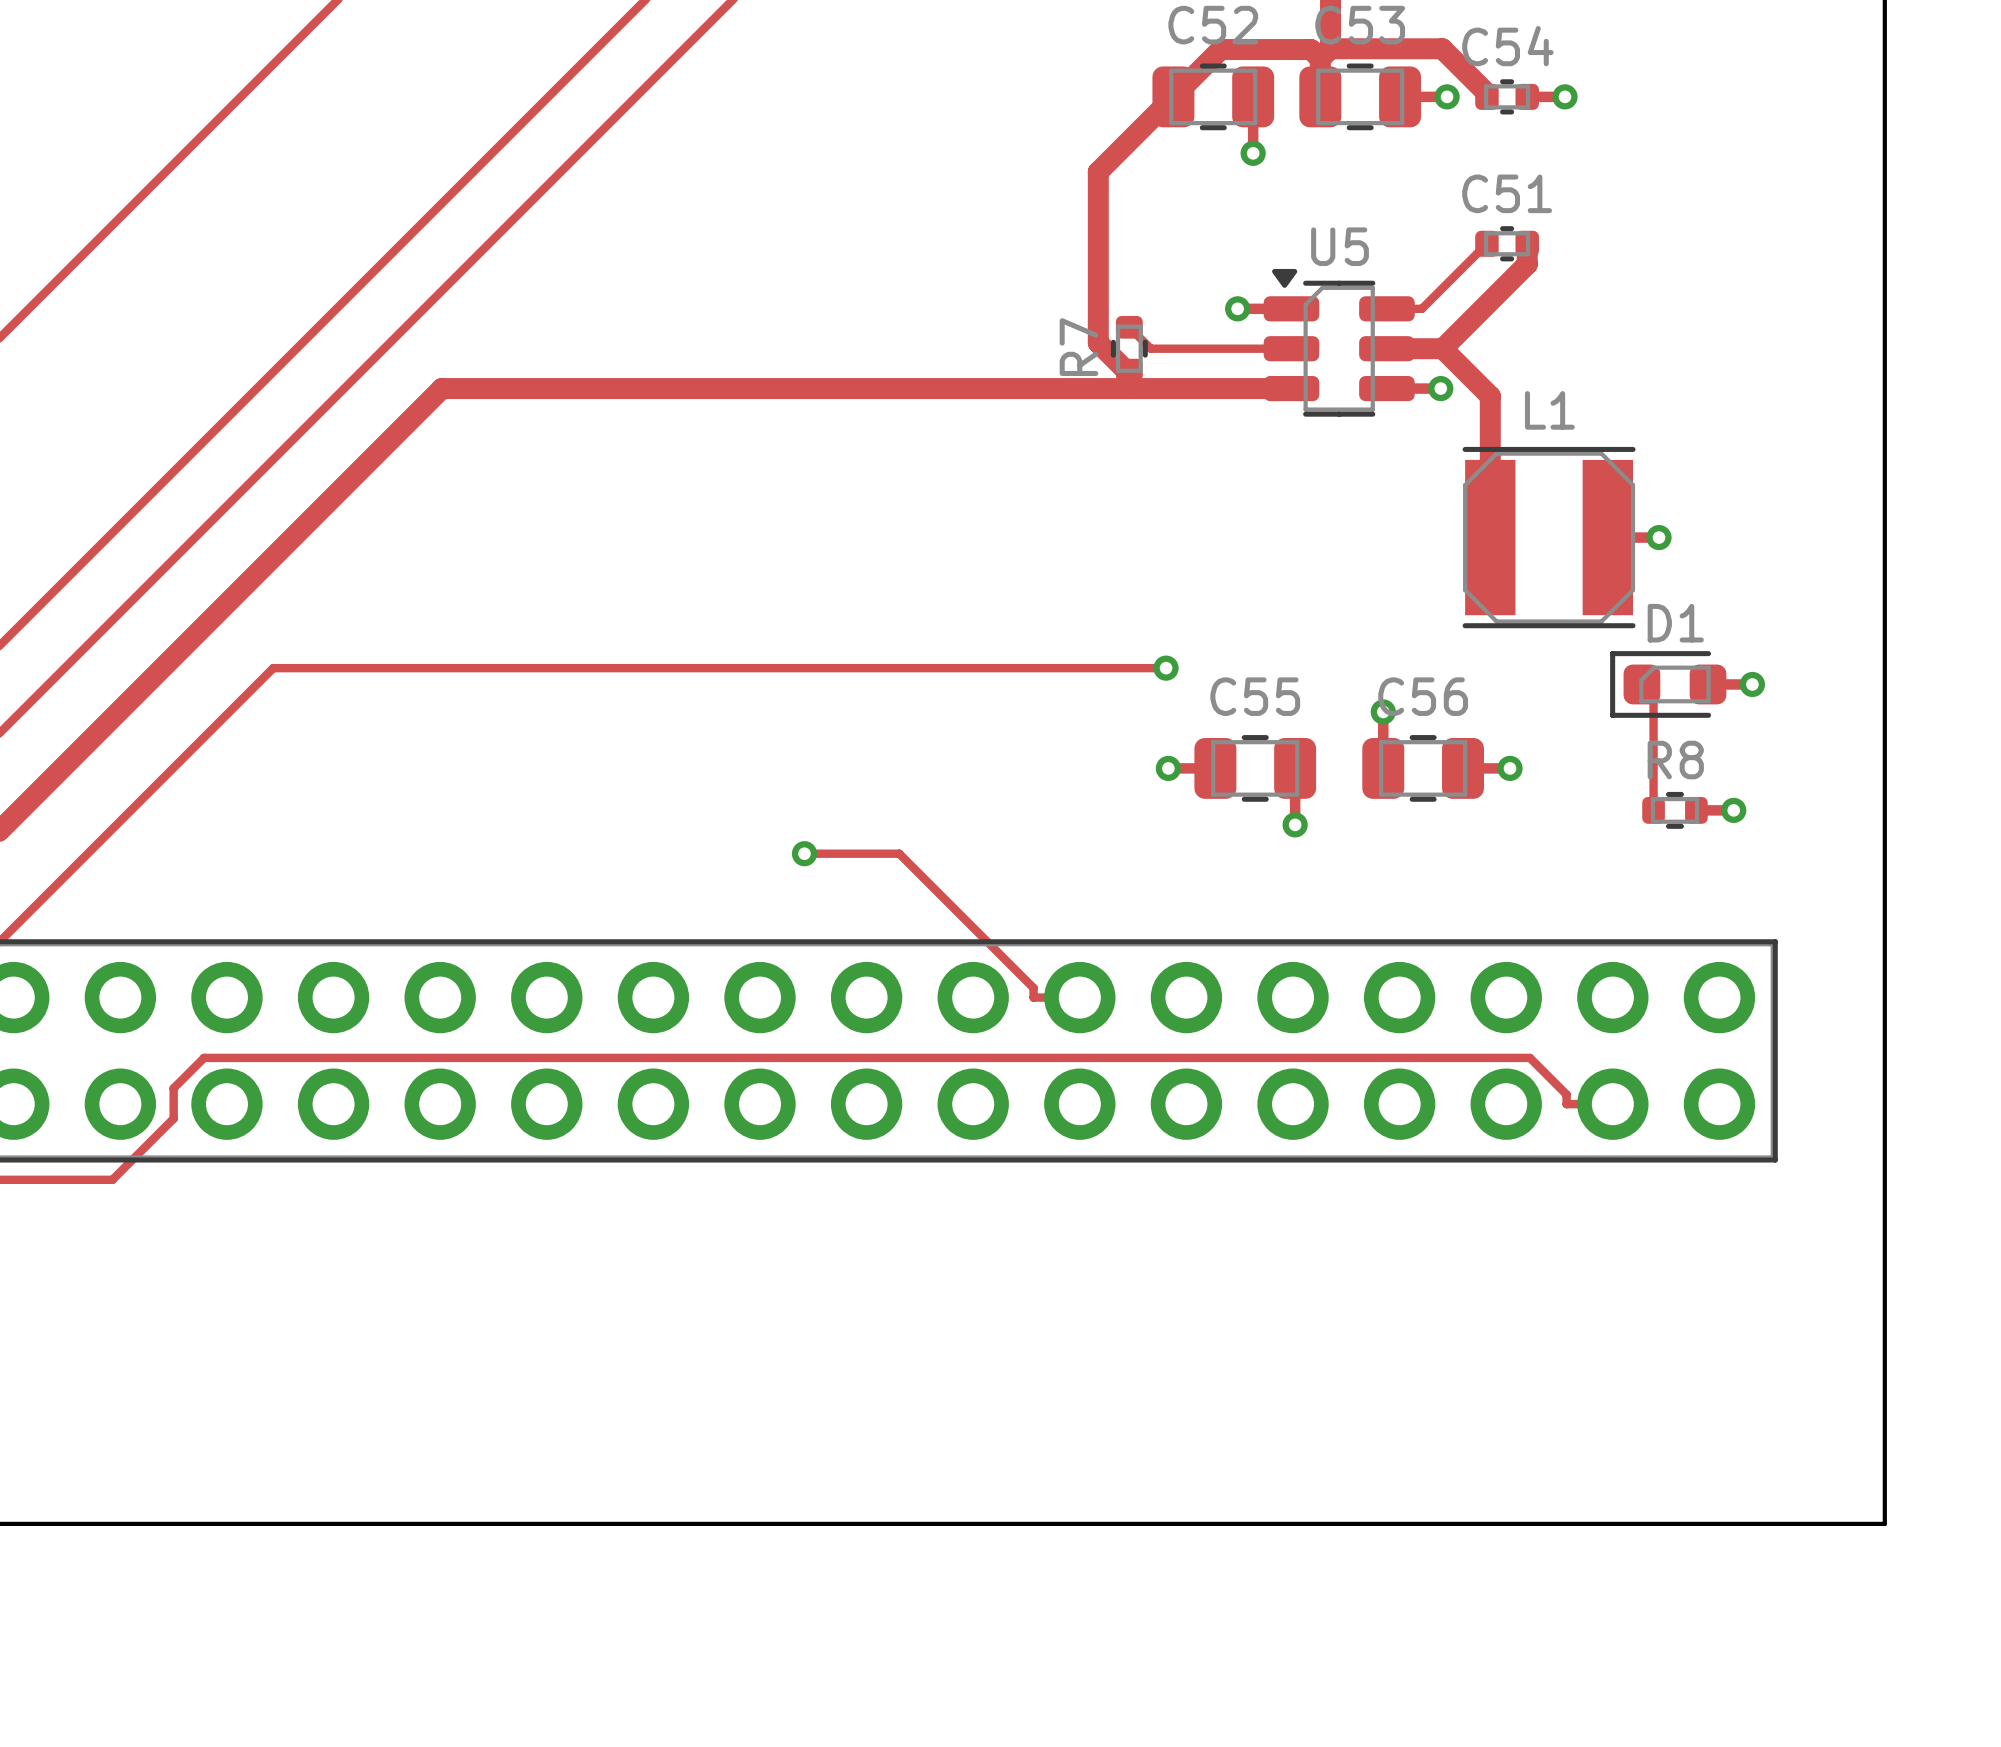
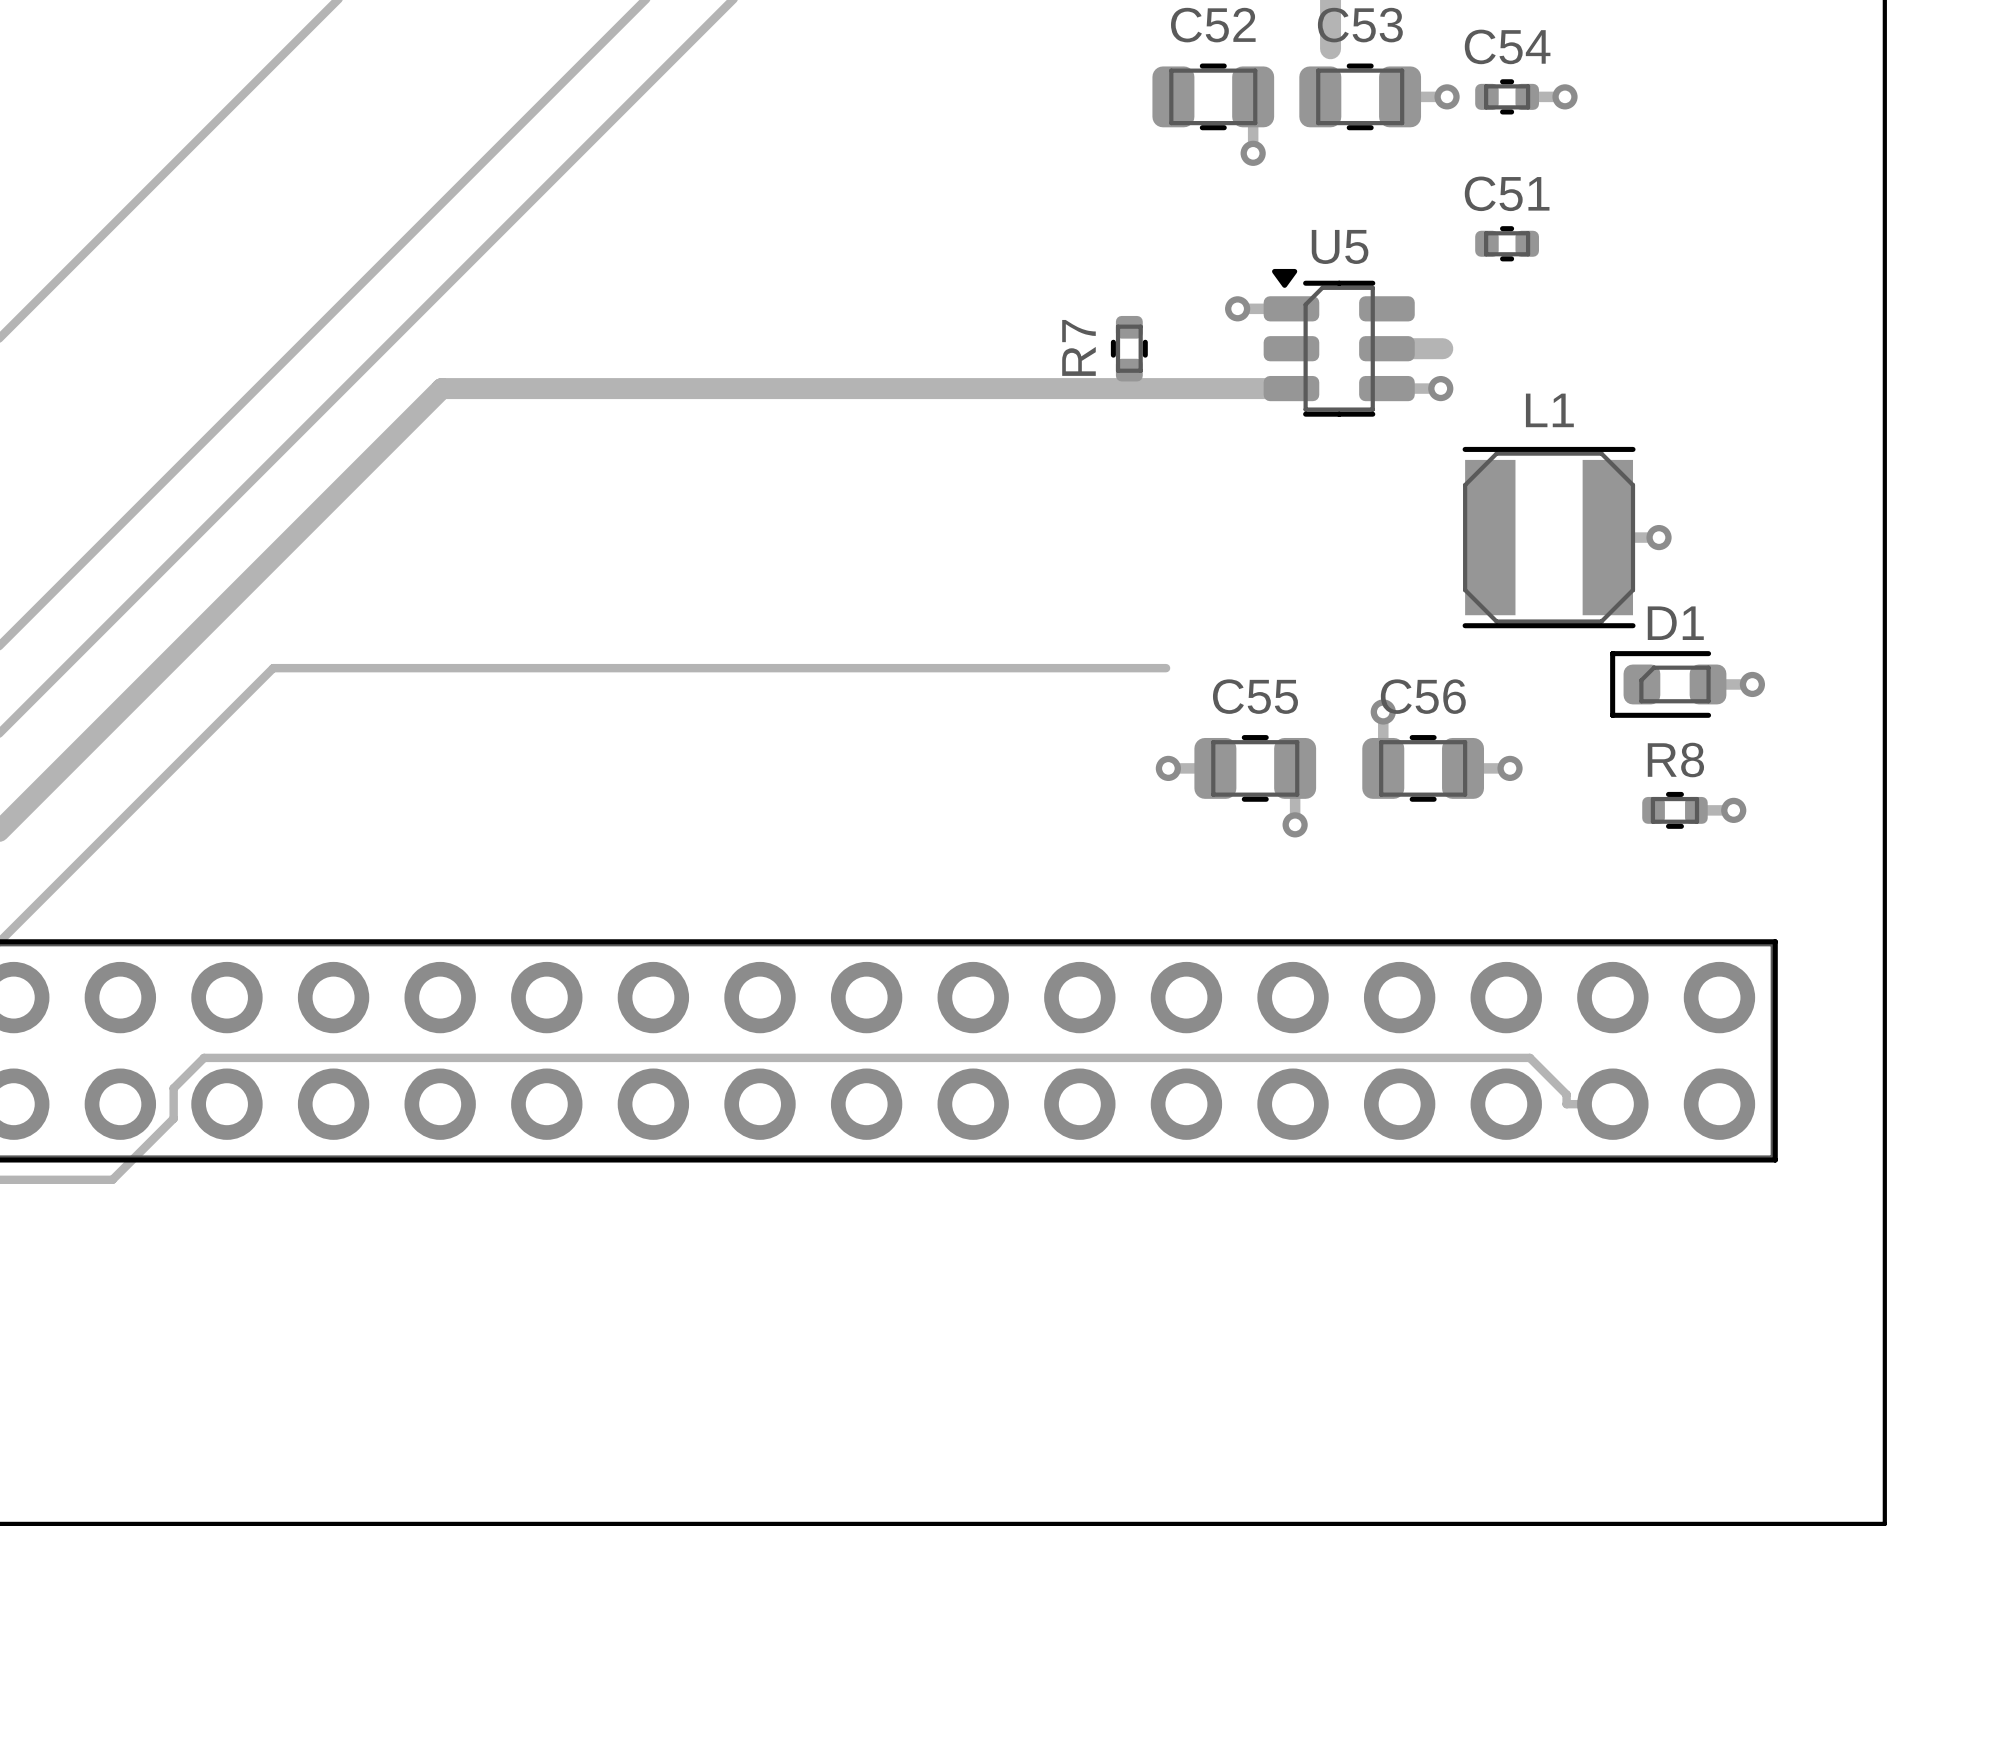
track: (1320, 58) (1330, 48) (1442, 48) (1486, 93) (1486, 96) -> none
track: (1320, 58) (1310, 49) (1220, 49) (1098, 171) (1098, 342) (1125, 370) (1129, 370) (1129, 388) -> none
track: (1486, 243) (1421, 308) (1386, 308) -> none
track: (1527, 243) (1527, 264) (1442, 348) (1490, 396) (1490, 537) -> none
track: (1129, 327) (1150, 348) (1291, 348) -> none
via: (1166, 668) -> none
track: (1641, 684) (1653, 696) (1653, 810) -> none
track: (804, 853) (899, 853) (1033, 987) (1033, 997) (1079, 997) -> none
via: (804, 853) -> none

